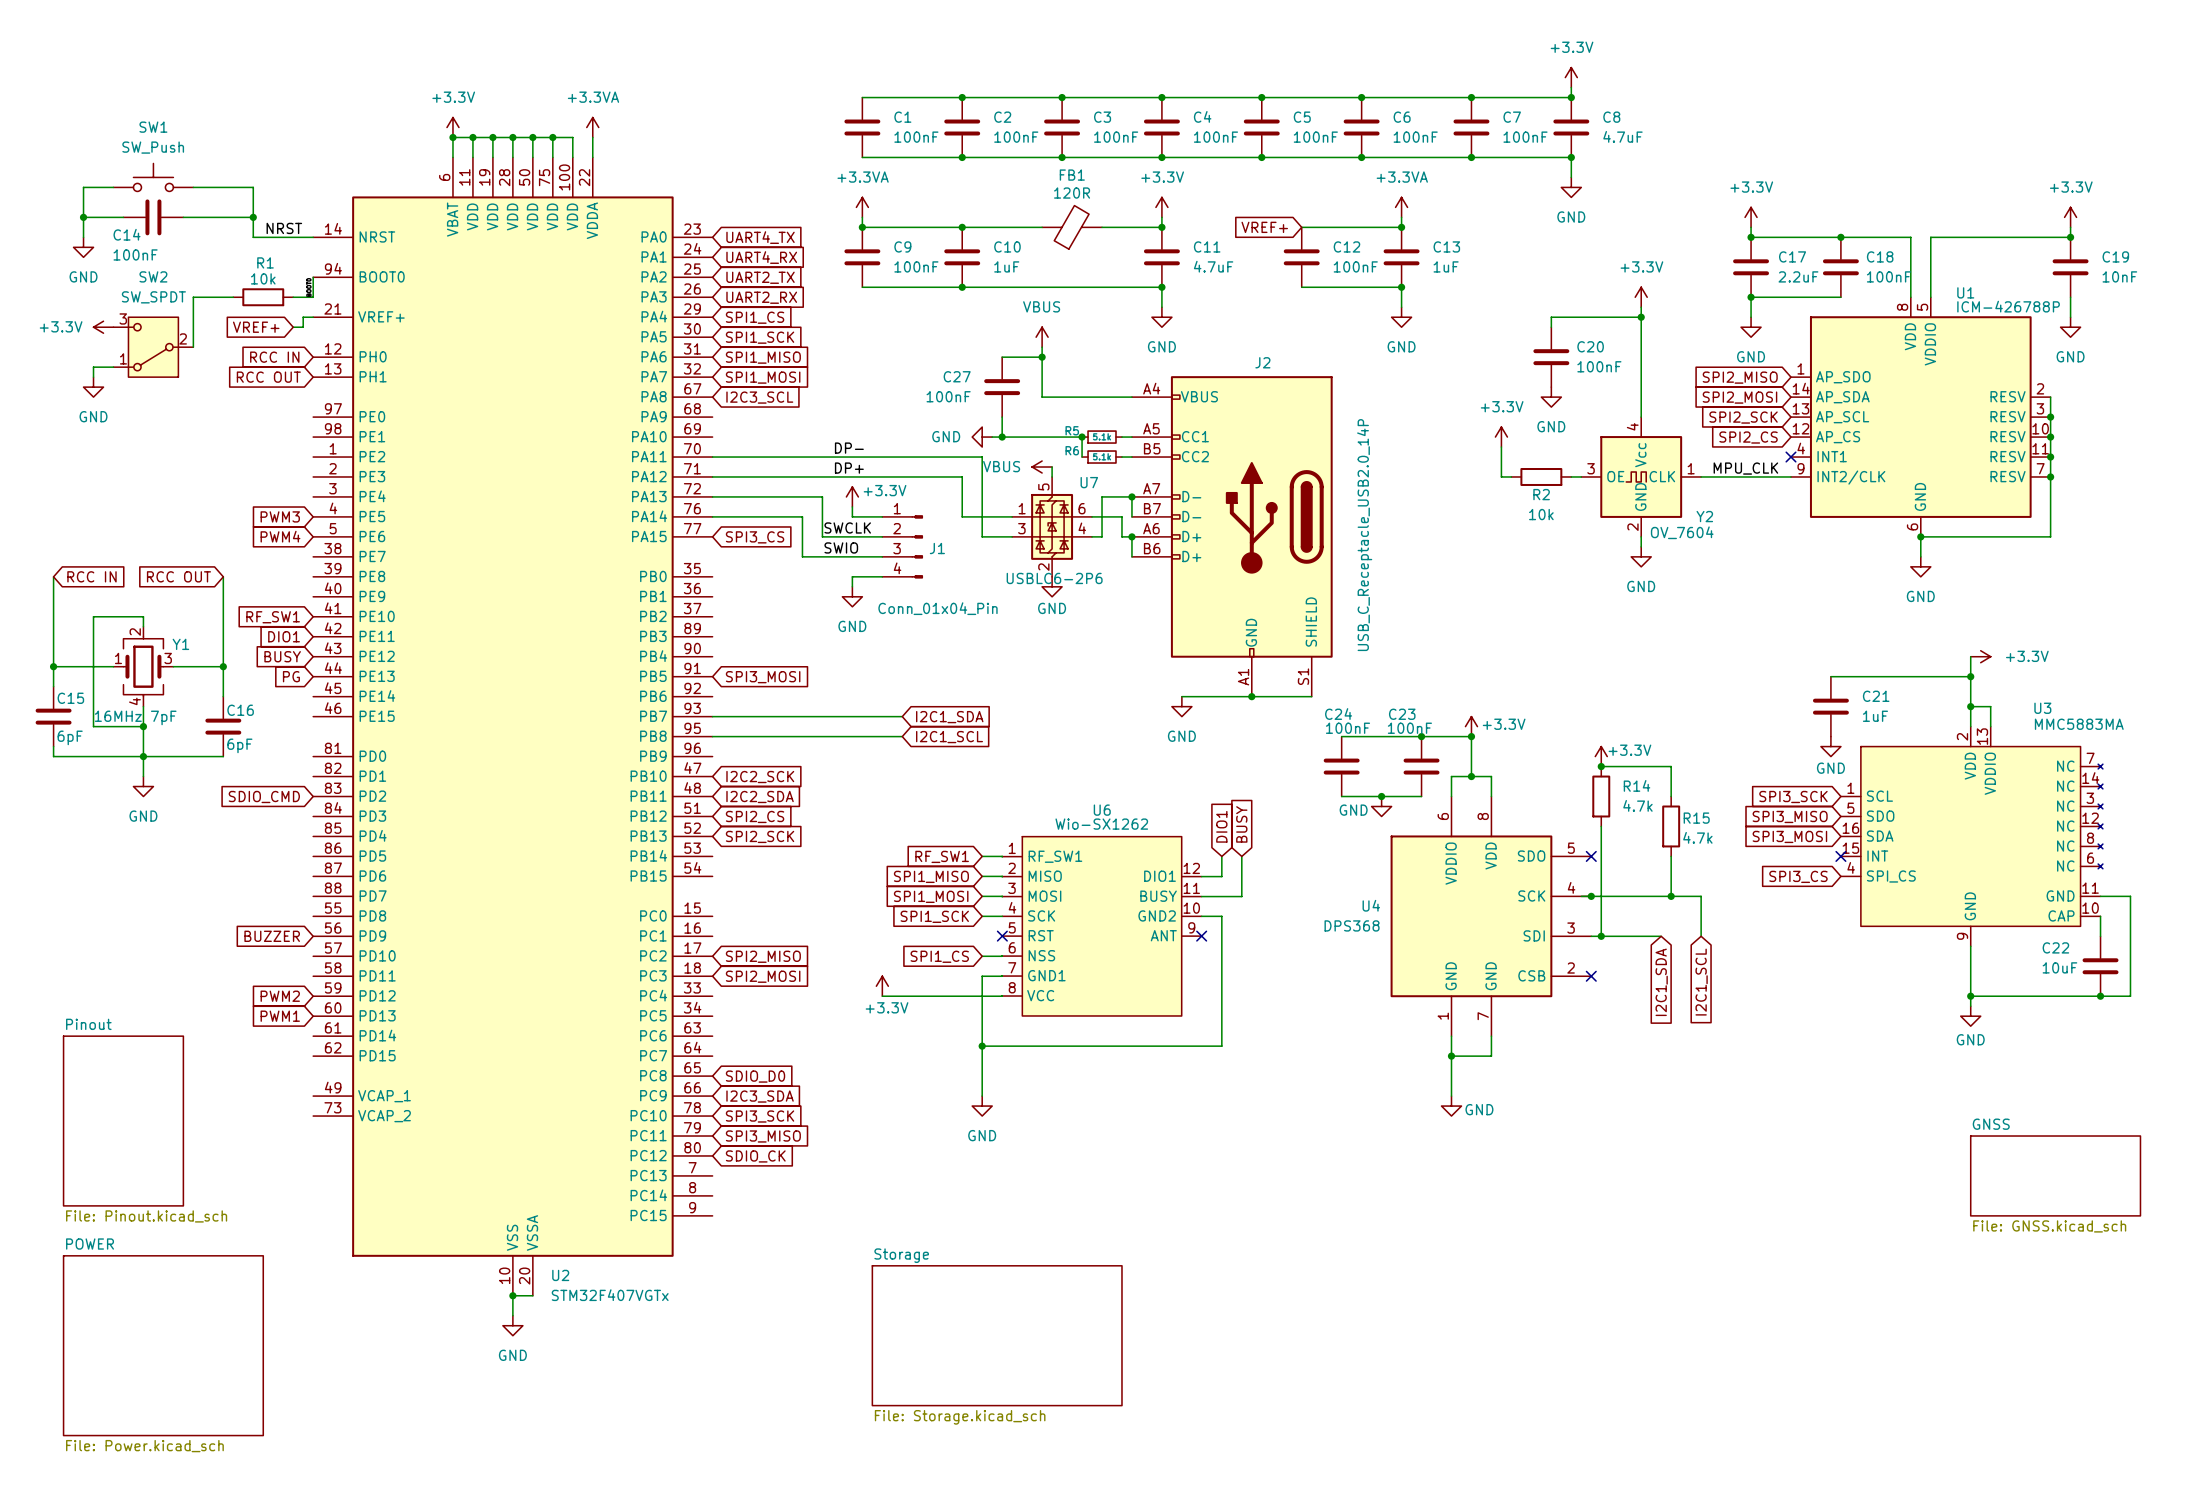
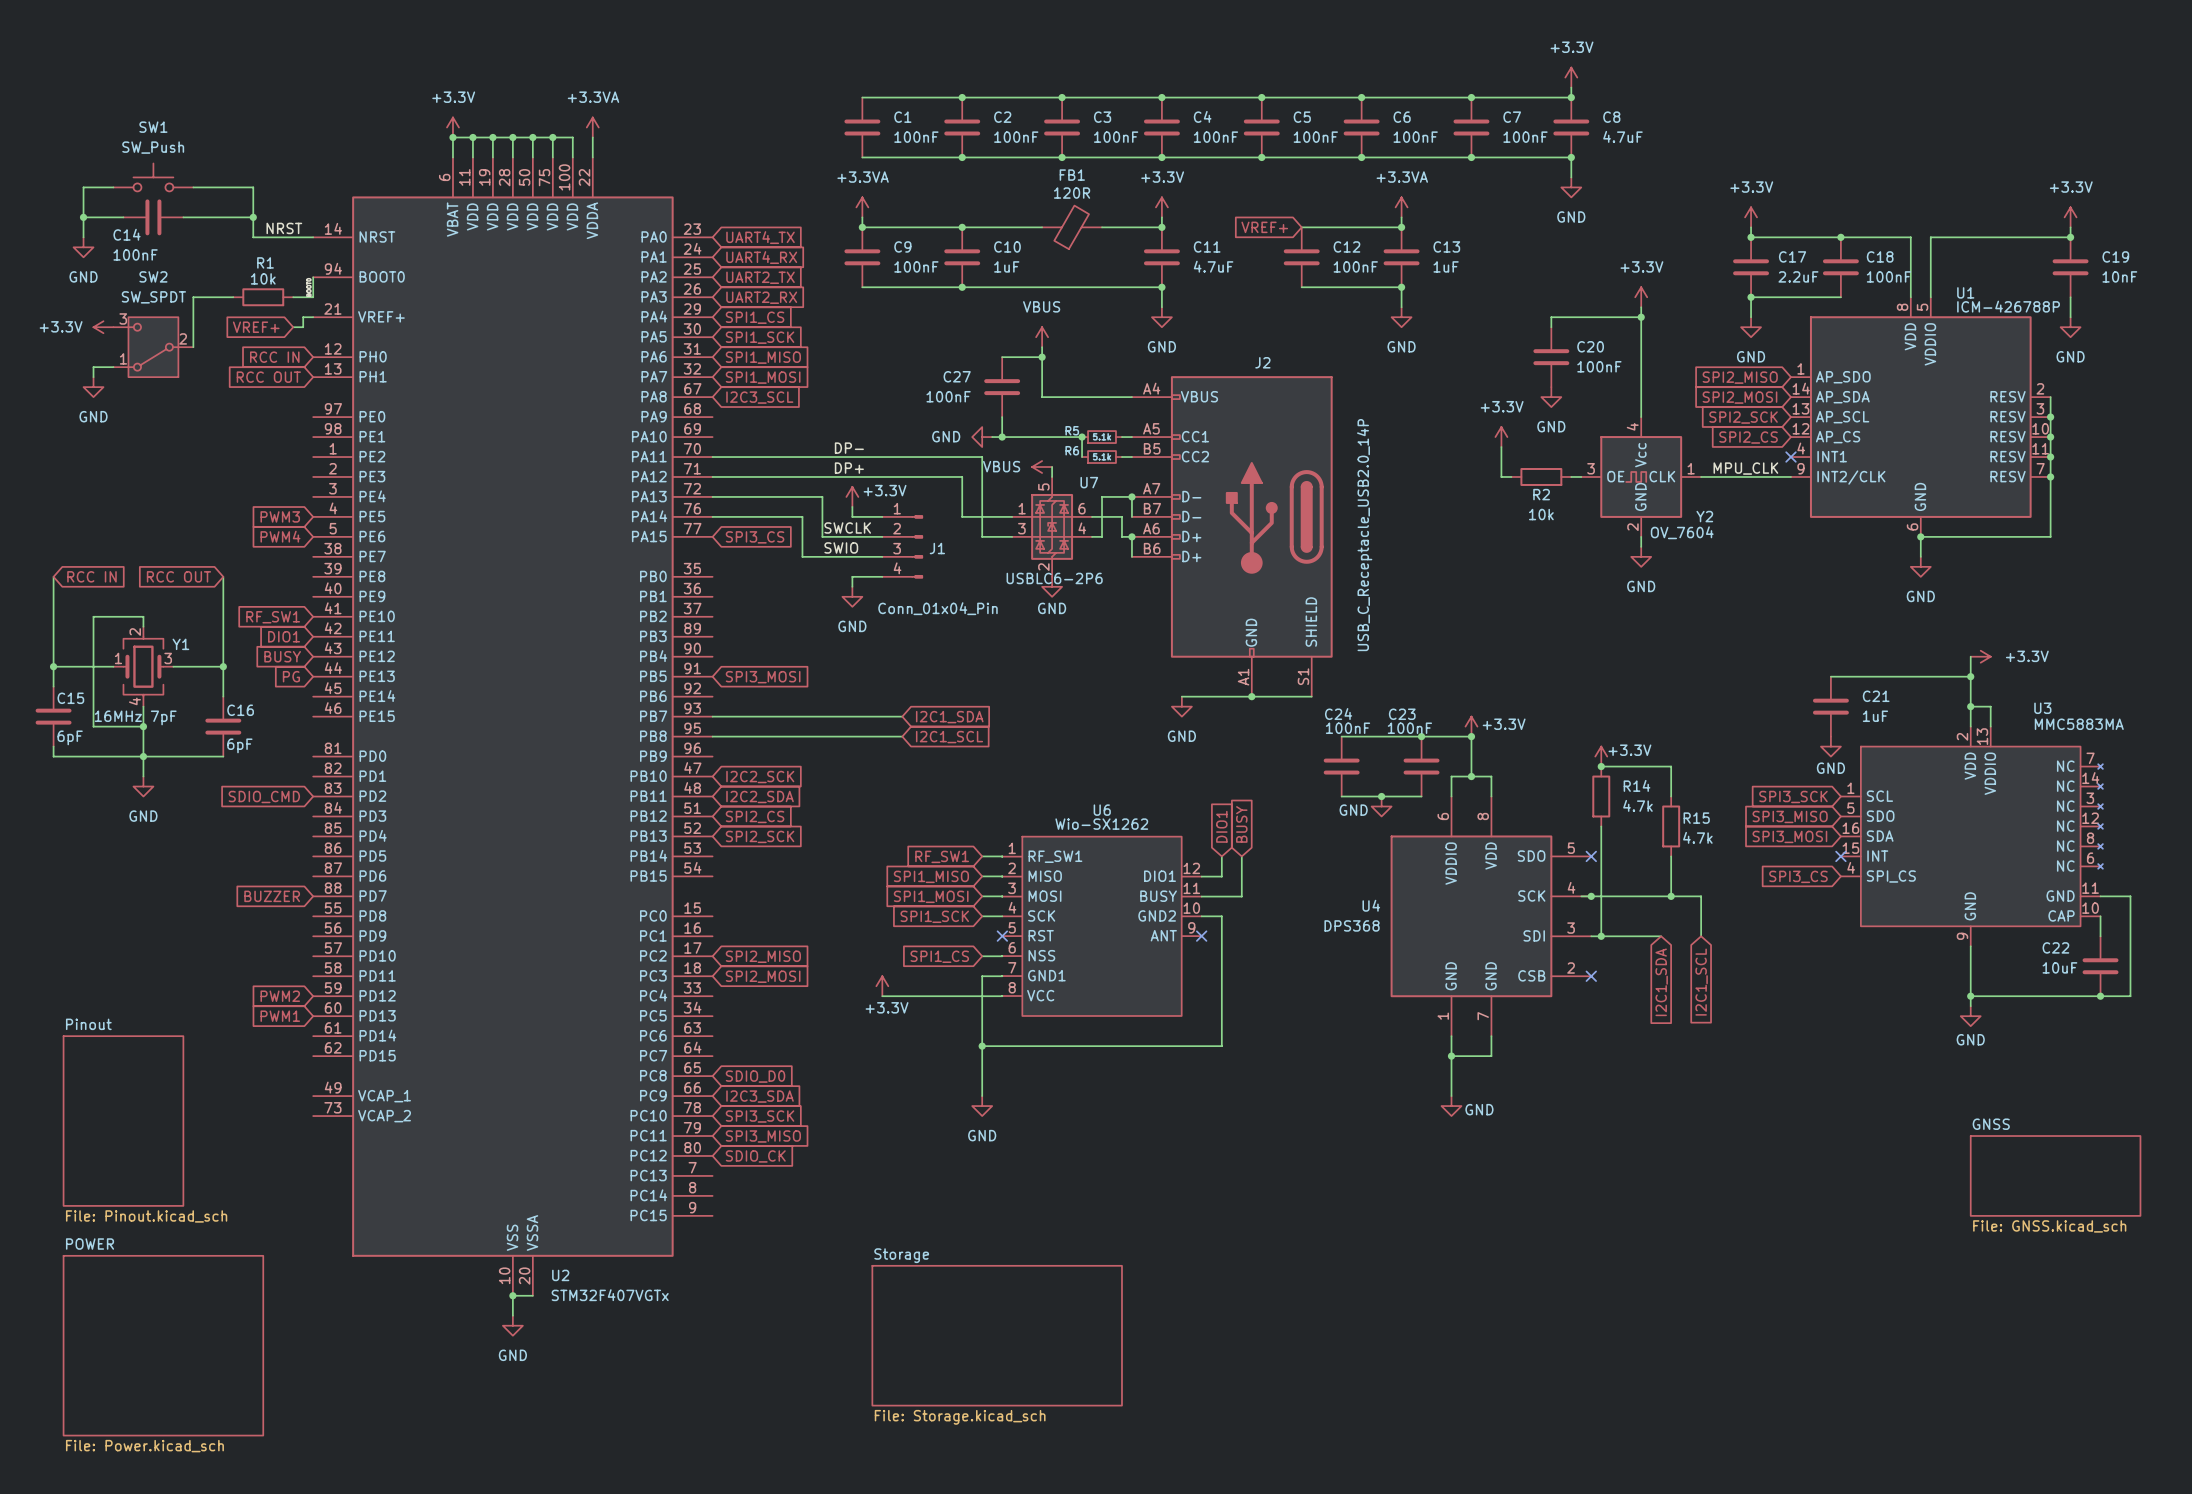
global label position: BUZZER (272, 936) -> BUZZER (272, 896)

